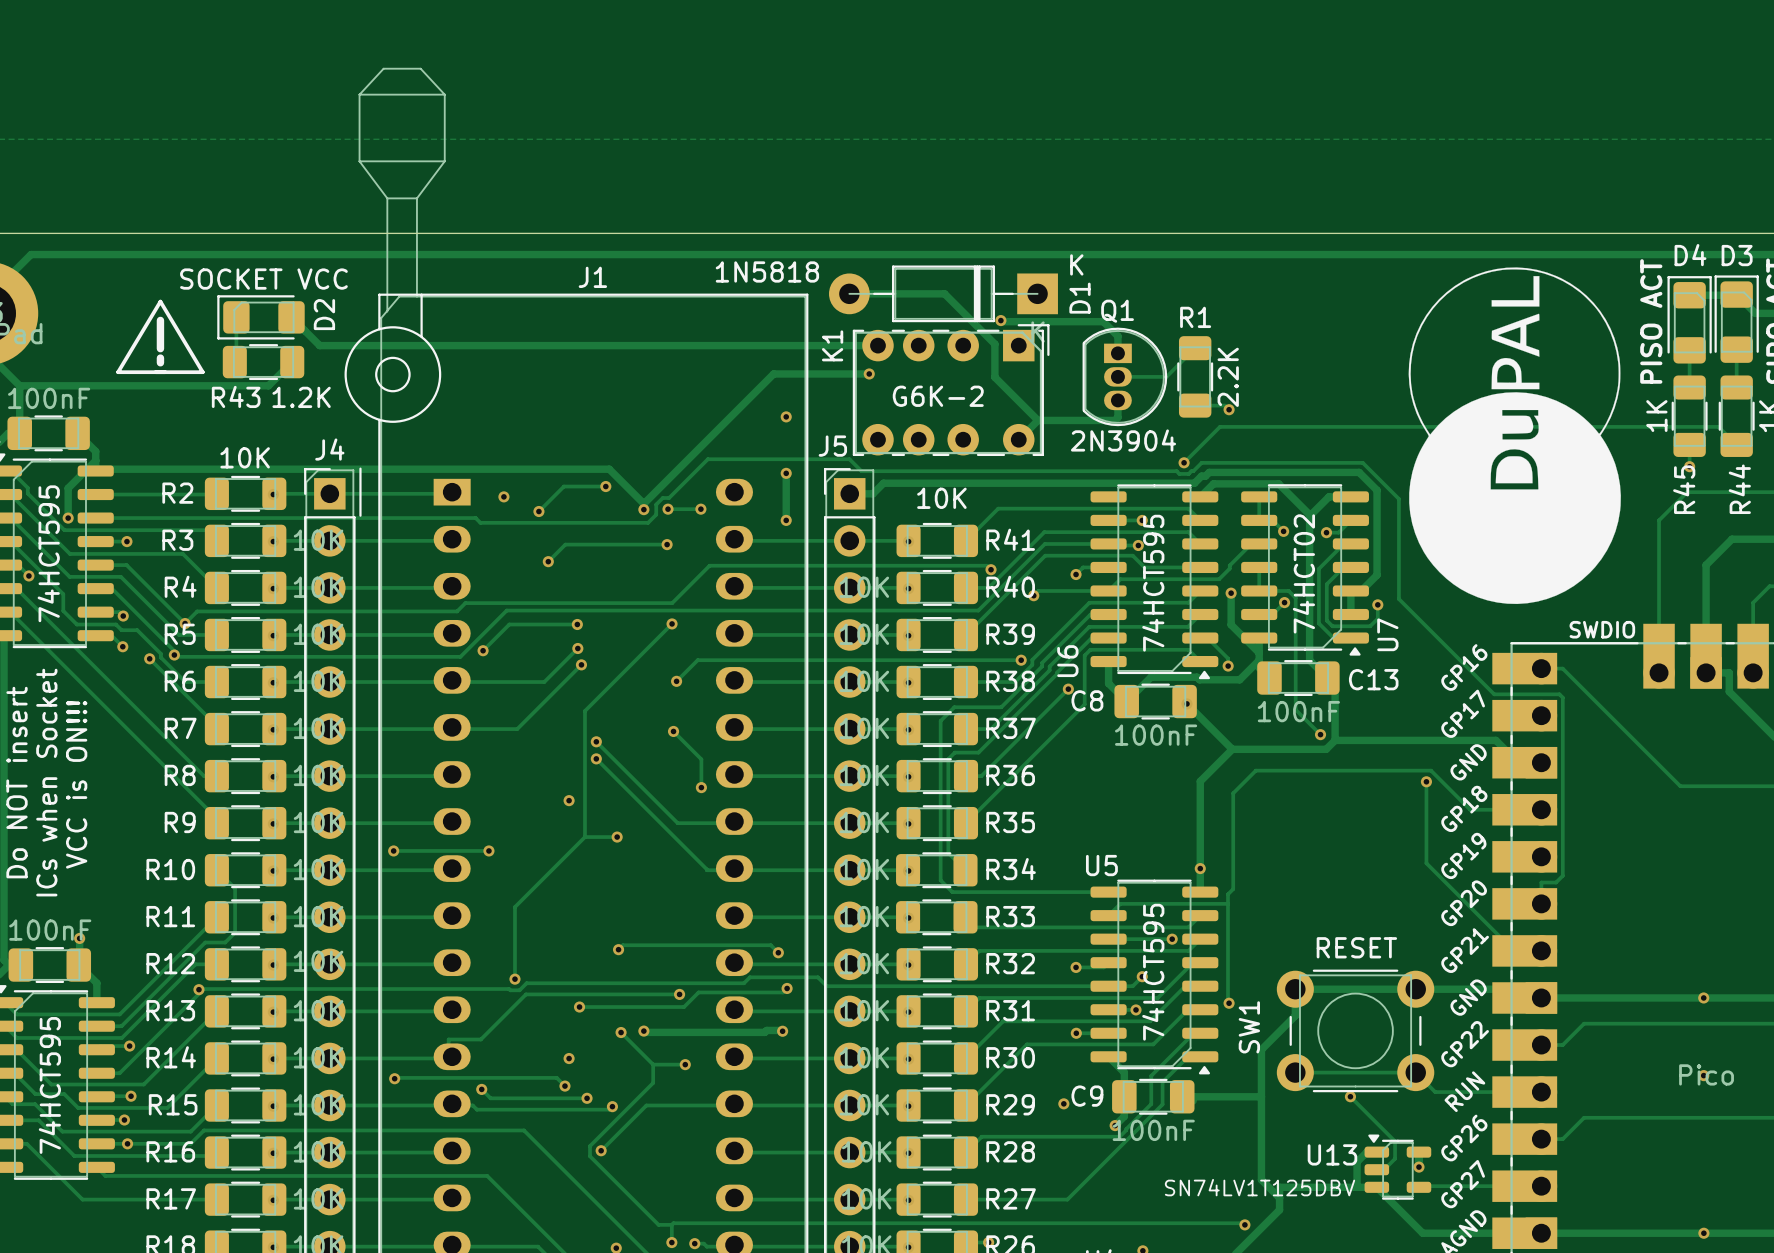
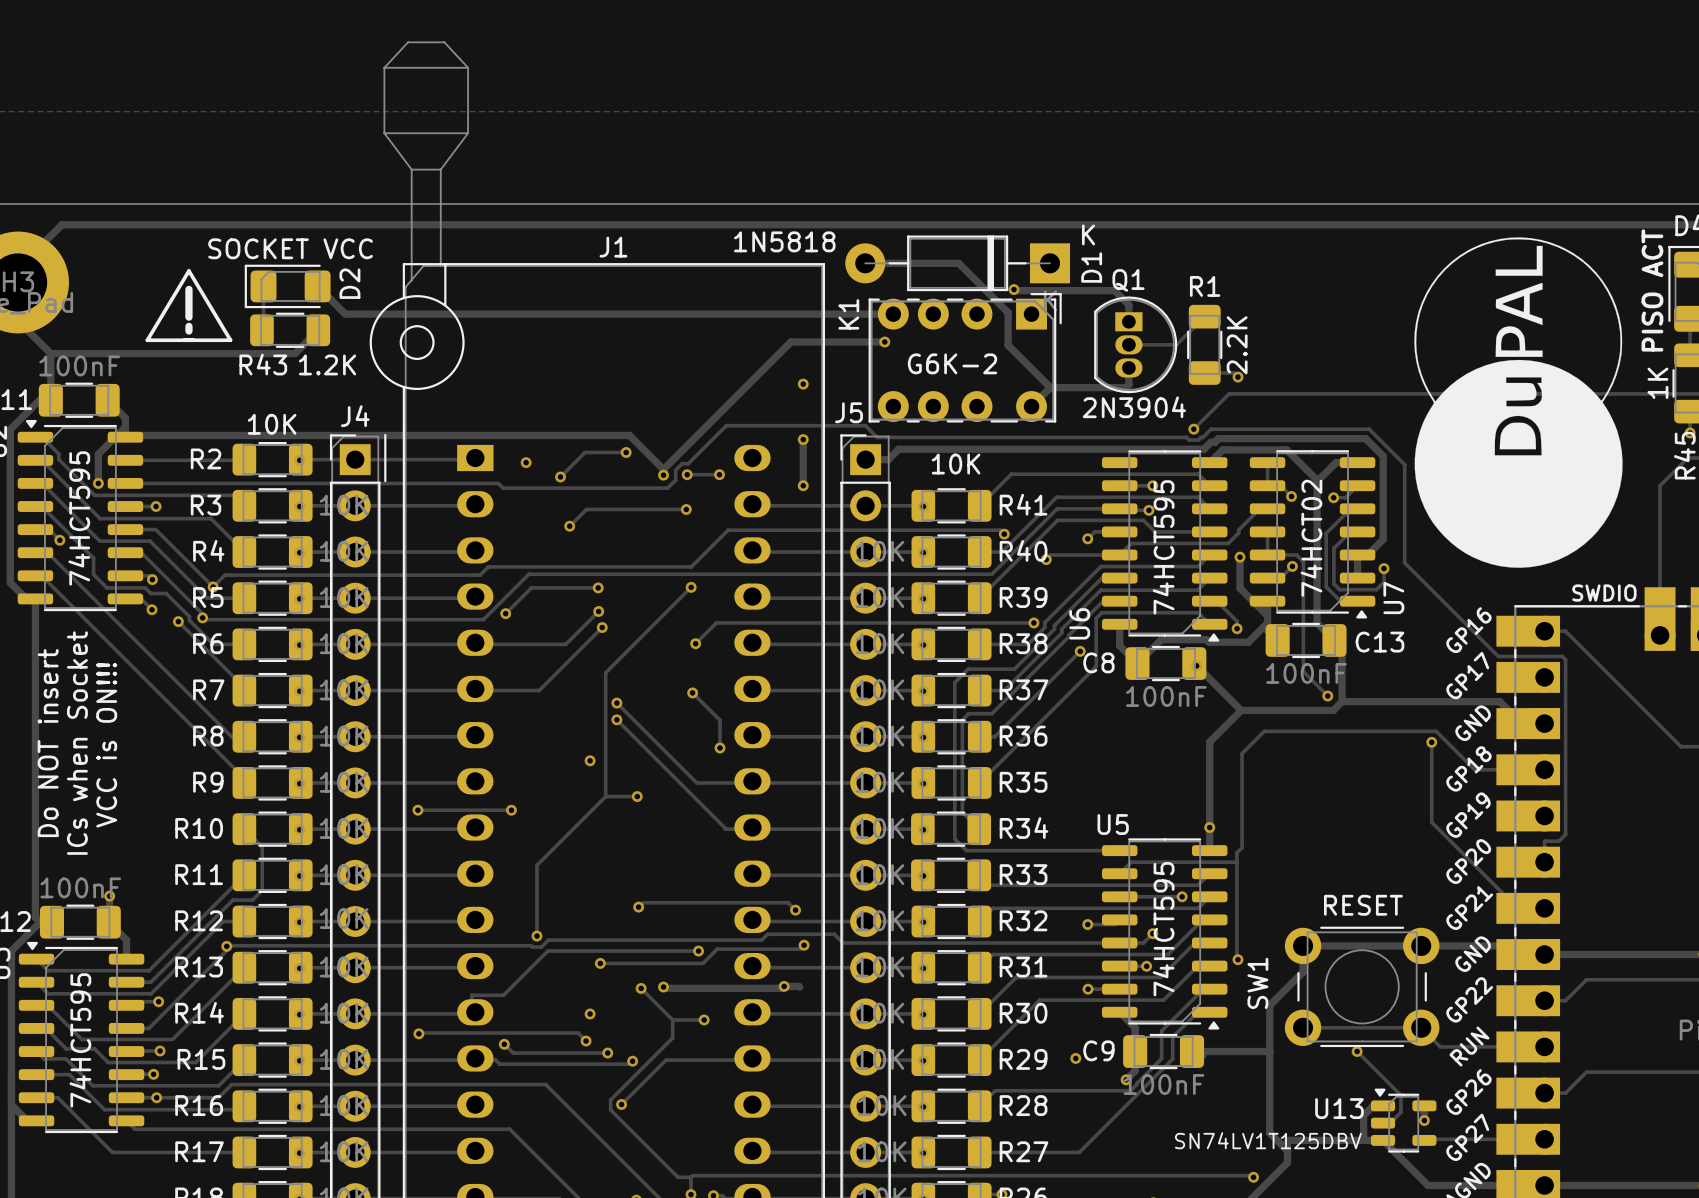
via position: (782, 1031) -> (784, 986)

